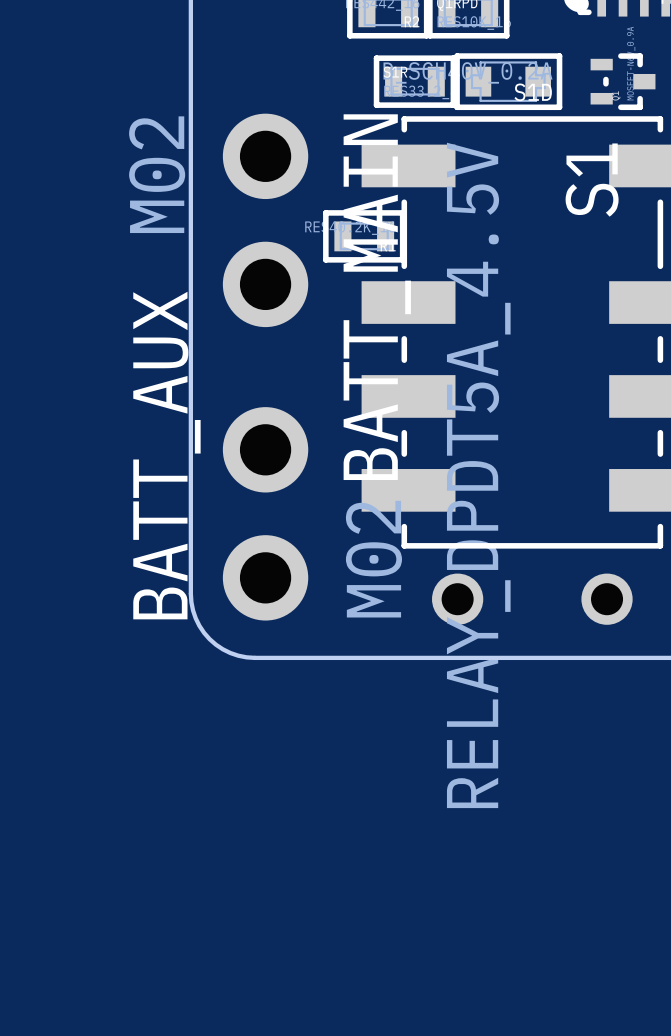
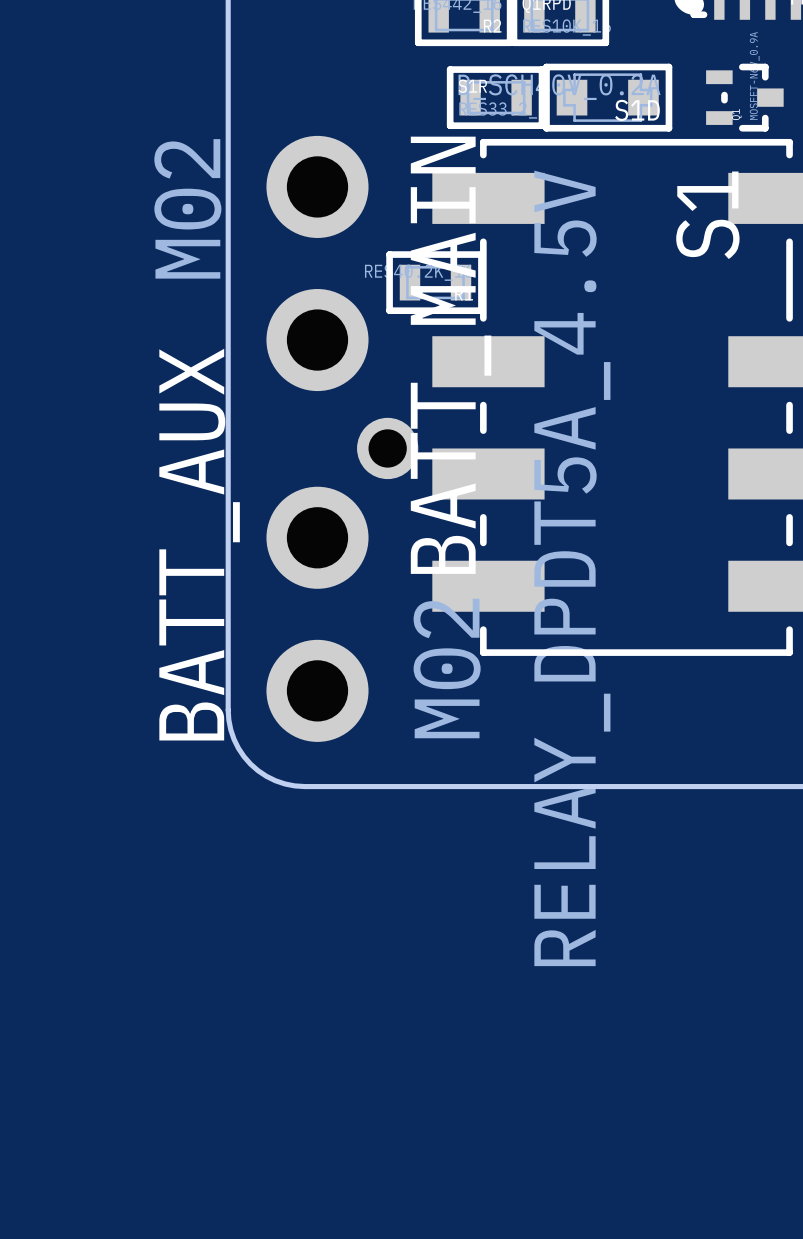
part: none -> (387, 448)
part: (457, 599) -> none
part: (607, 599) -> none

